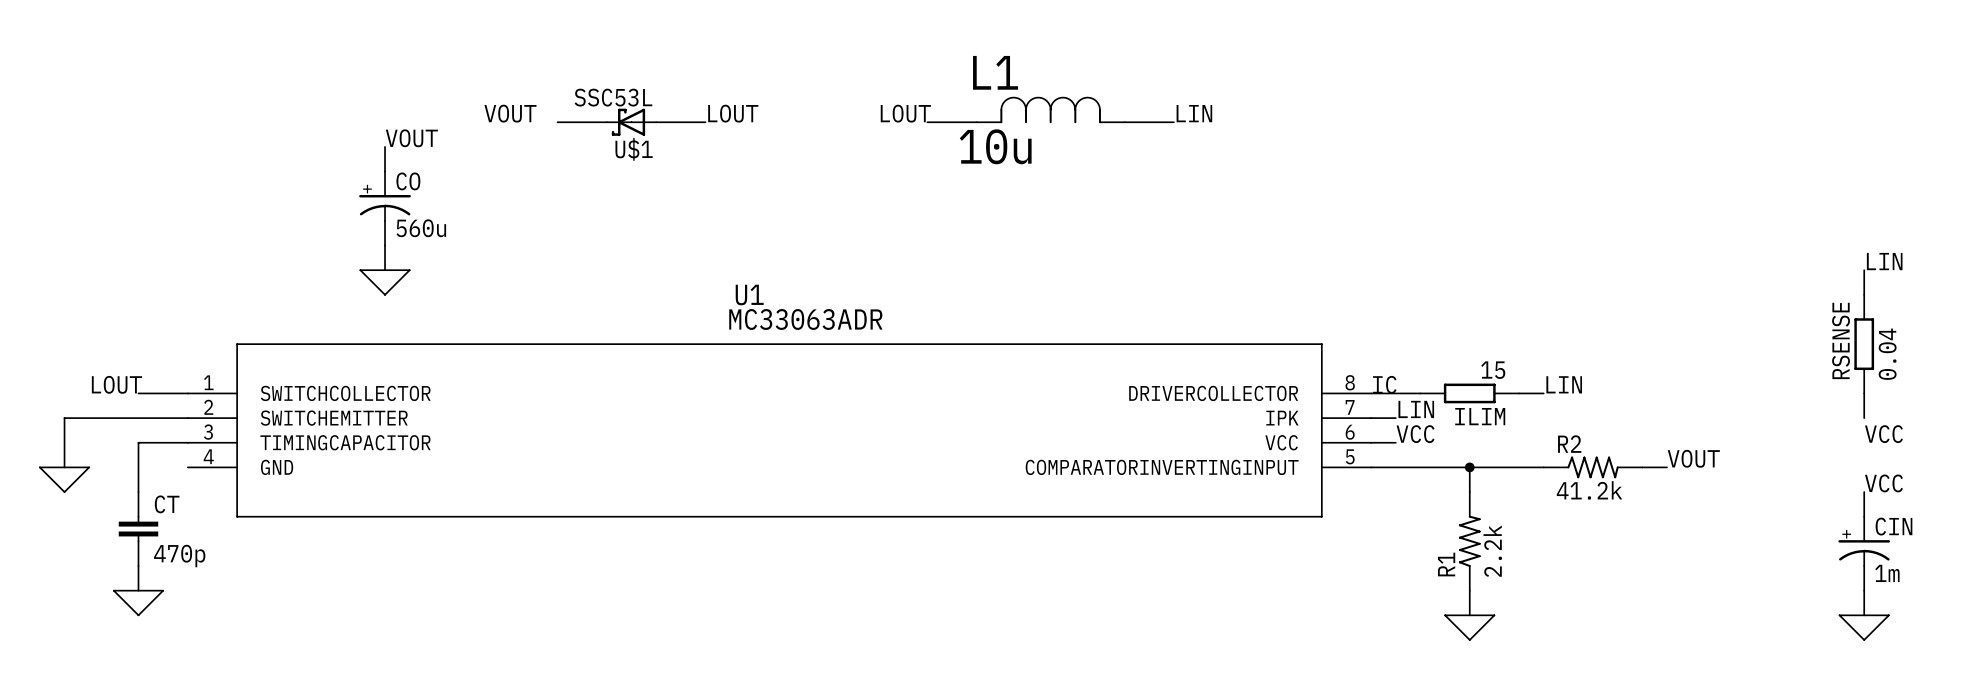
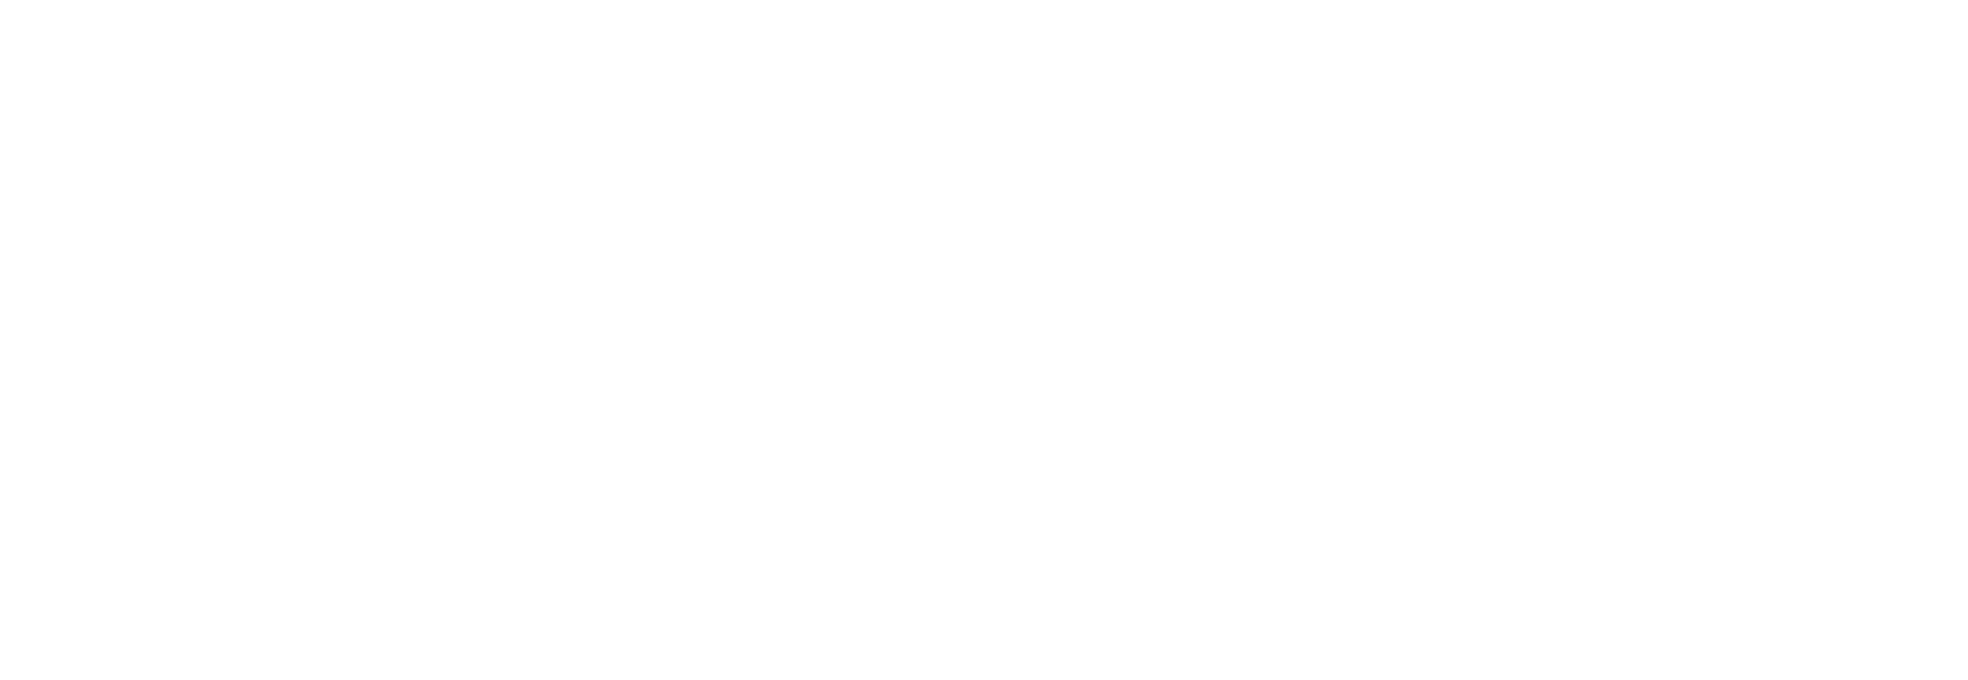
L1: 10u (1050, 110) -> none
label: VOUT (510, 113) -> none
label: LOUT (733, 113) -> none
label: LOUT (905, 113) -> none
label: LIN (1194, 113) -> none
wire: (557, 122) (606, 122) -> none
U$1: SSC53L (631, 122) -> none
wire: (656, 122) (705, 122) -> none
wire: (927, 122) (976, 122) -> none
wire: (1124, 122) (1173, 122) -> none
label: VOUT (411, 138) -> none
wire: (385, 146) (385, 171) -> none
CO: 560u (385, 208) -> none
wire: (385, 245) (385, 270) -> none
label: LIN (1884, 261) -> none
wire: (1864, 270) (1864, 294) -> none
power symbol: (385, 282) -> none
RSENSE: 0.04 (1864, 344) -> none
label: LOUT (116, 384) -> none
label: IC (1384, 384) -> none
label: LIN (1564, 384) -> none
wire: (138, 393) (187, 393) -> none
wire: (1371, 393) (1420, 393) -> none
ILIM: 15 (1469, 393) -> none
wire: (1519, 393) (1543, 393) -> none
wire: (1864, 393) (1864, 418) -> none
label: LIN (1416, 409) -> none
wire: (187, 418) (64, 418) (64, 467) -> none
wire: (1371, 418) (1395, 418) -> none
U1: MC33063ADR (779, 430) -> none
label: VCC (1415, 434) -> none
label: VCC (1883, 434) -> none
wire: (187, 442) (138, 442) (138, 492) -> none
wire: (1371, 442) (1395, 442) -> none
label: VOUT (1693, 458) -> none
wire: (1371, 467) (1543, 467) -> none
wire: (1469, 467) (1469, 492) -> none
junction: (1469, 467) -> none
R2: 41.2k (1593, 467) -> none
wire: (1642, 467) (1666, 467) -> none
power symbol: (64, 479) -> none
label: VCC (1883, 483) -> none
wire: (1864, 492) (1864, 516) -> none
CT: 470p (138, 529) -> none
R1: 2.2k (1469, 541) -> none
CIN: 1m (1864, 553) -> none
wire: (138, 566) (138, 590) -> none
wire: (1469, 590) (1469, 615) -> none
wire: (1864, 590) (1864, 615) -> none
power symbol: (138, 603) -> none
power symbol: (1469, 627) -> none
power symbol: (1864, 627) -> none

